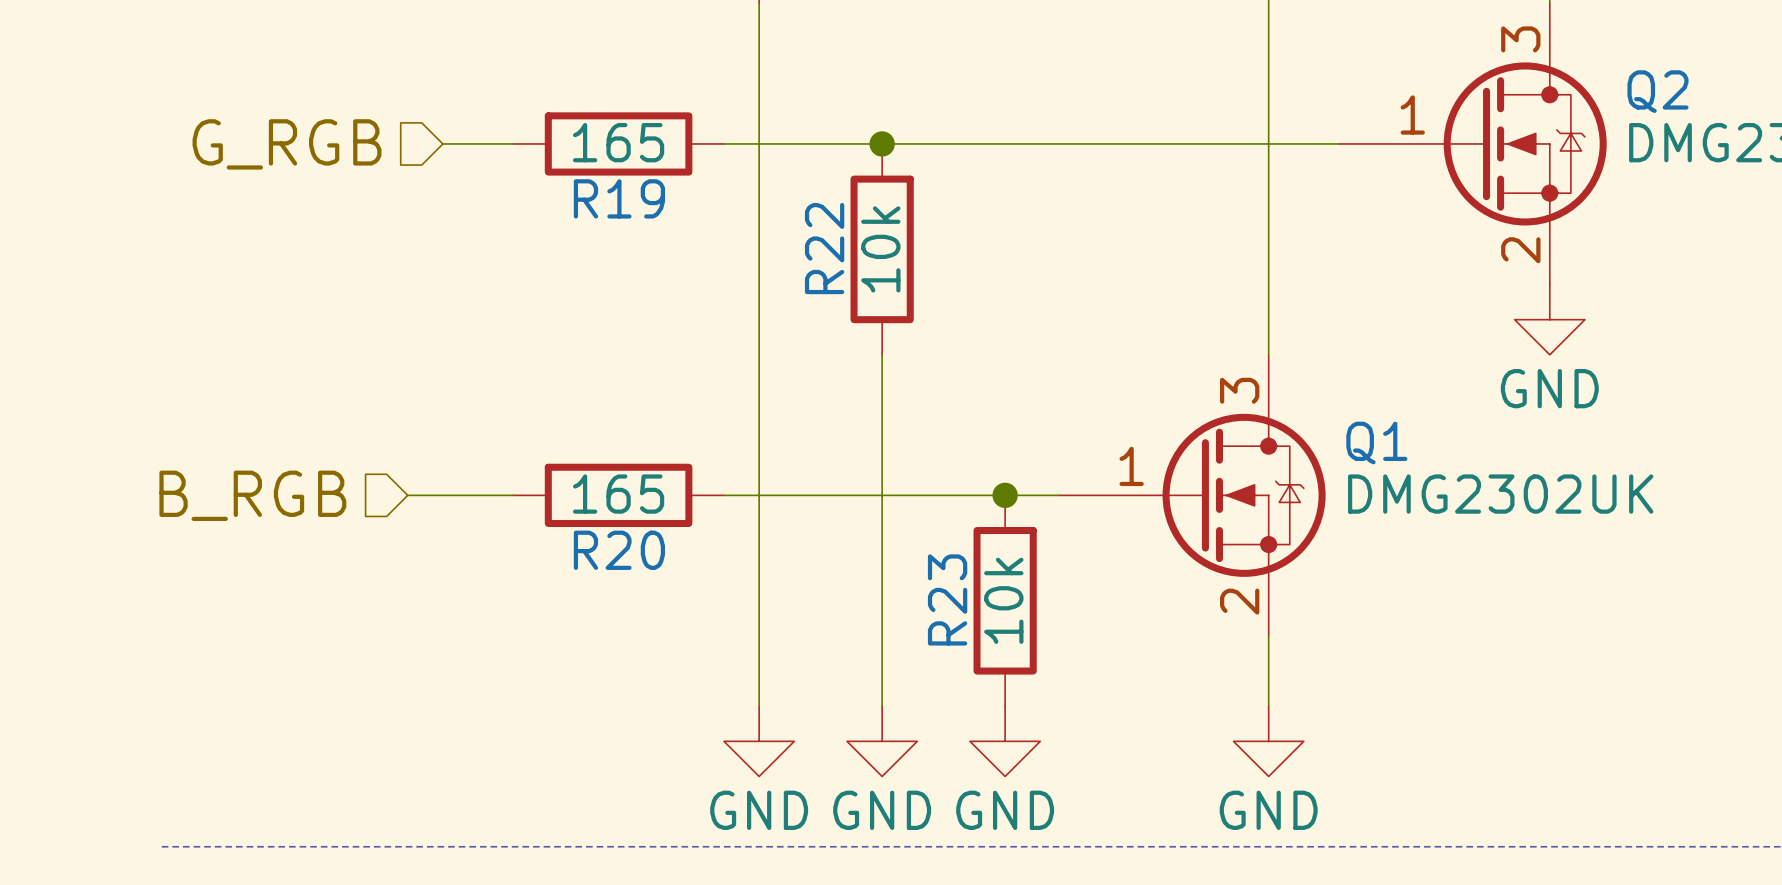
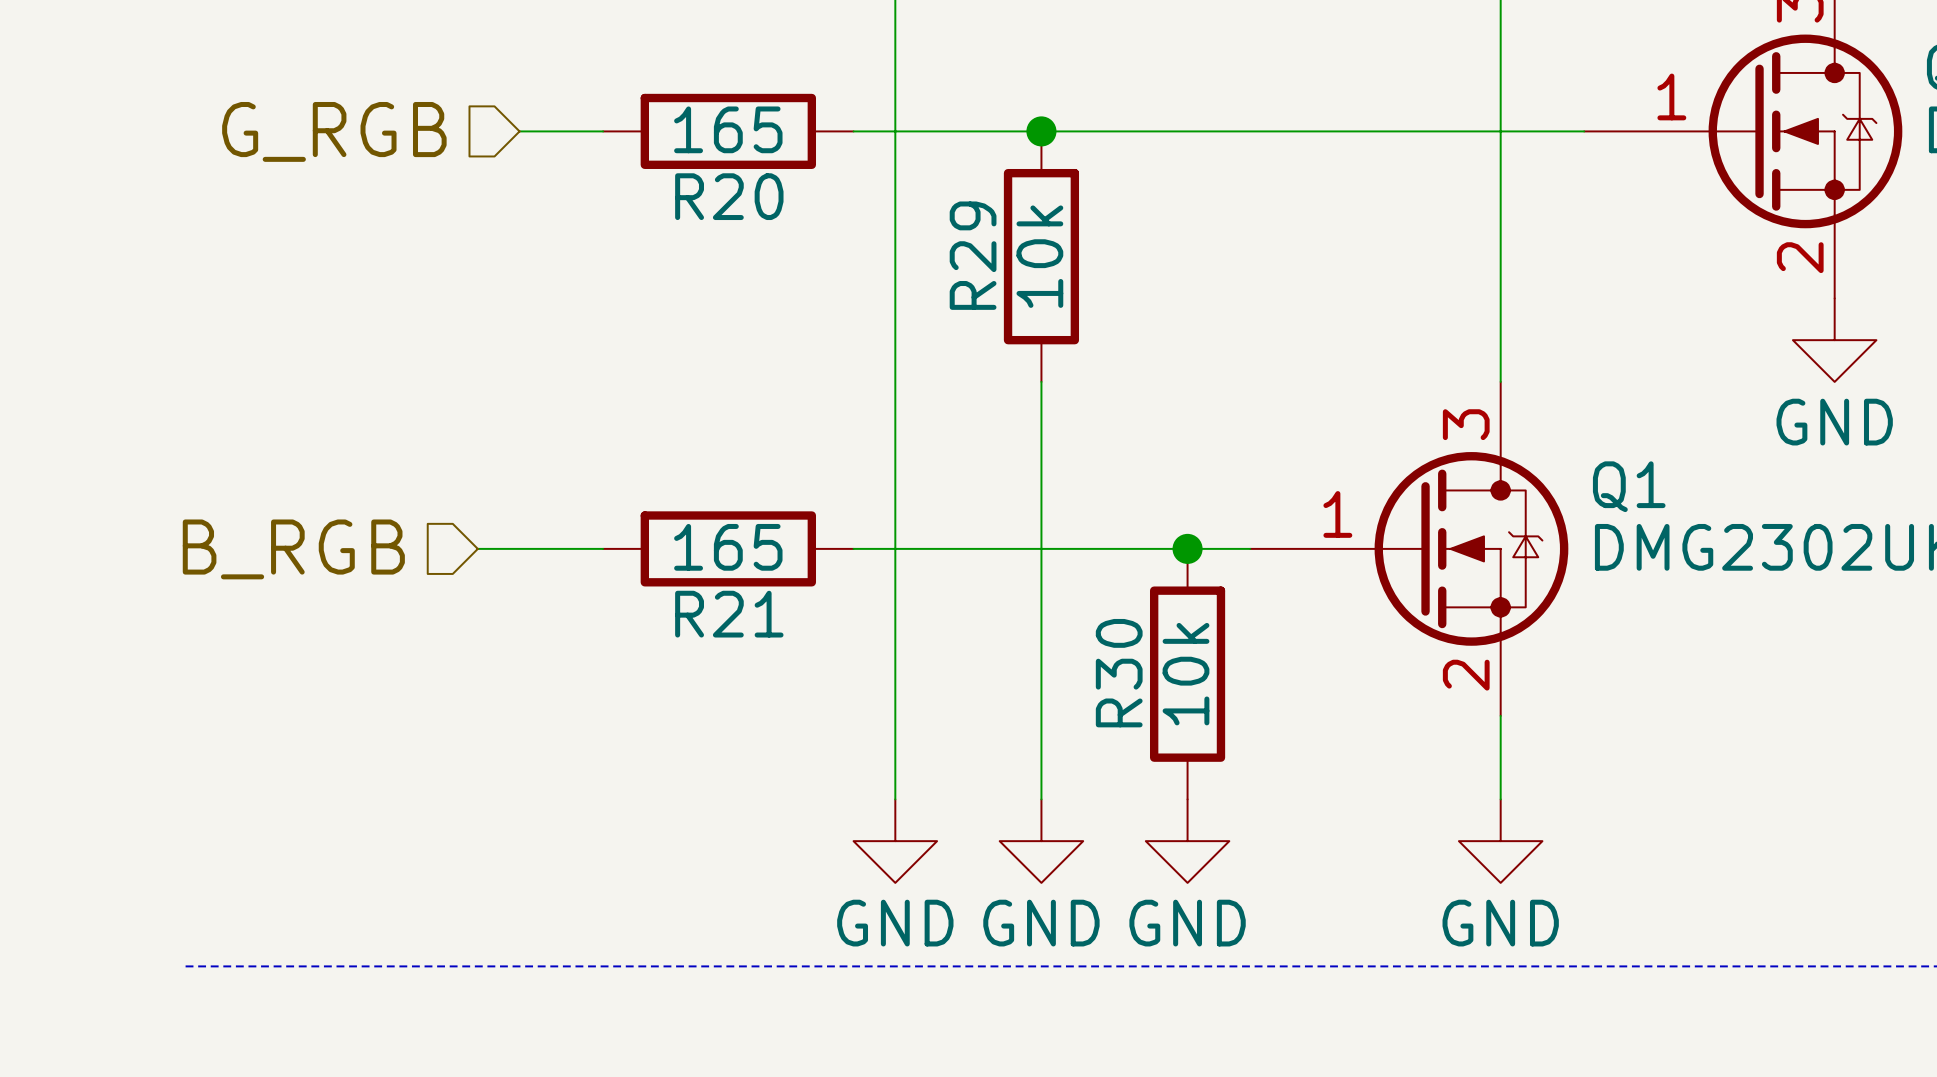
R19 name: R19 (619, 198) -> R20 (729, 196)
R22 name: R22 (824, 248) -> R29 (973, 255)
R20 name: R20 (619, 550) -> R21 (729, 614)
R23 name: R23 (947, 599) -> R30 (1119, 673)

